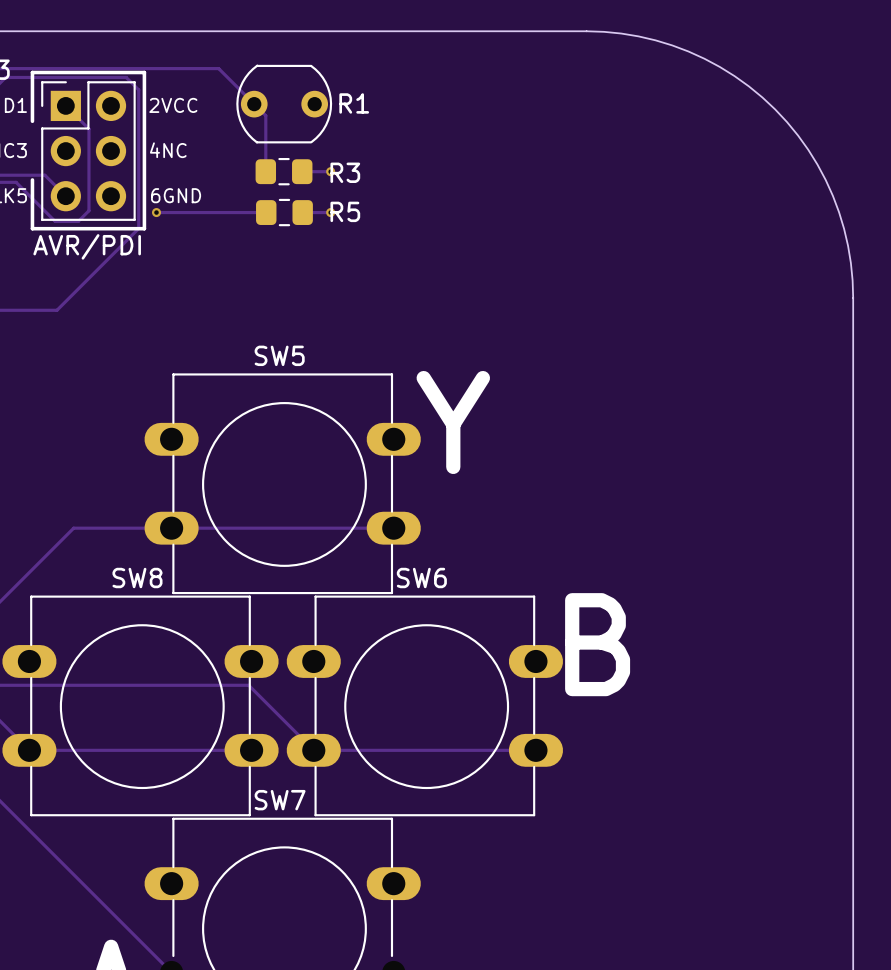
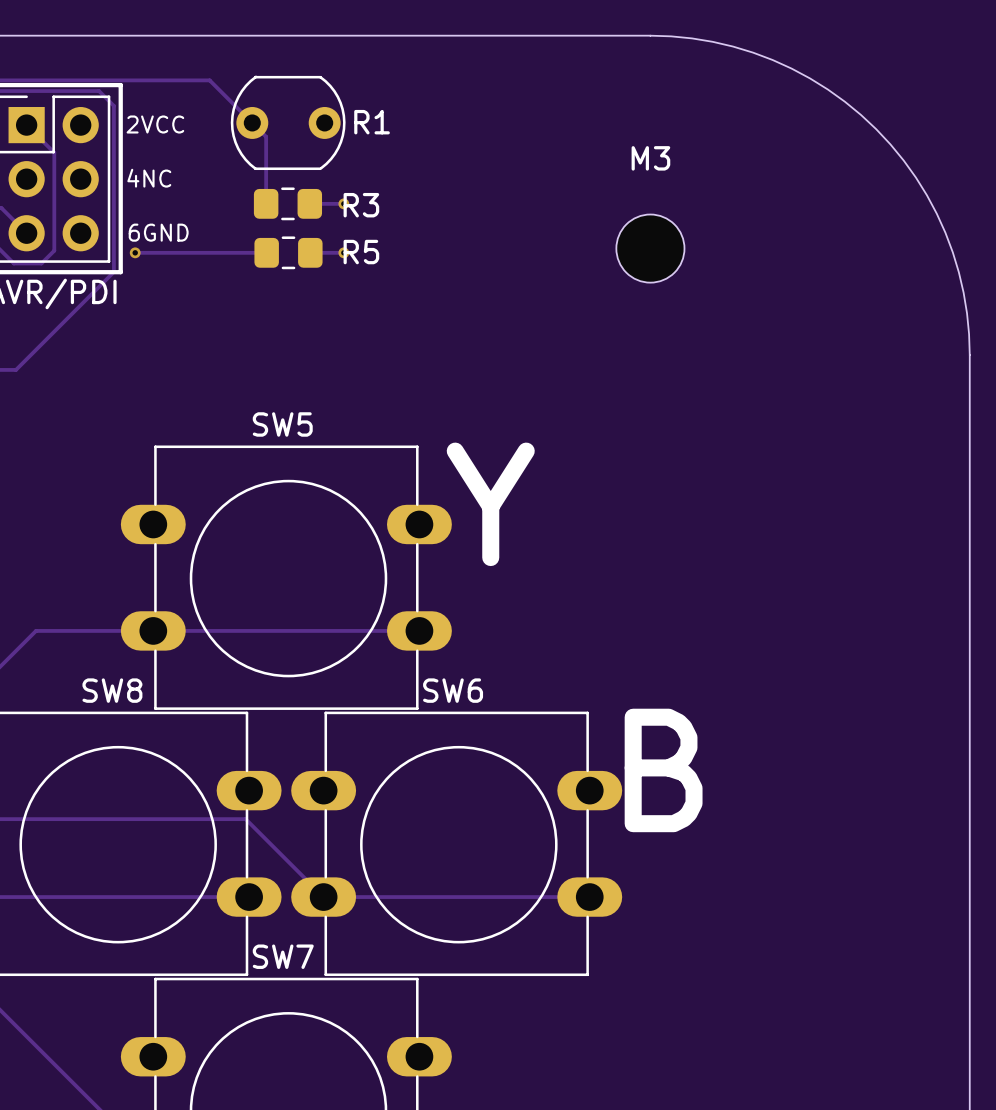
M3: none -> (650, 248)

